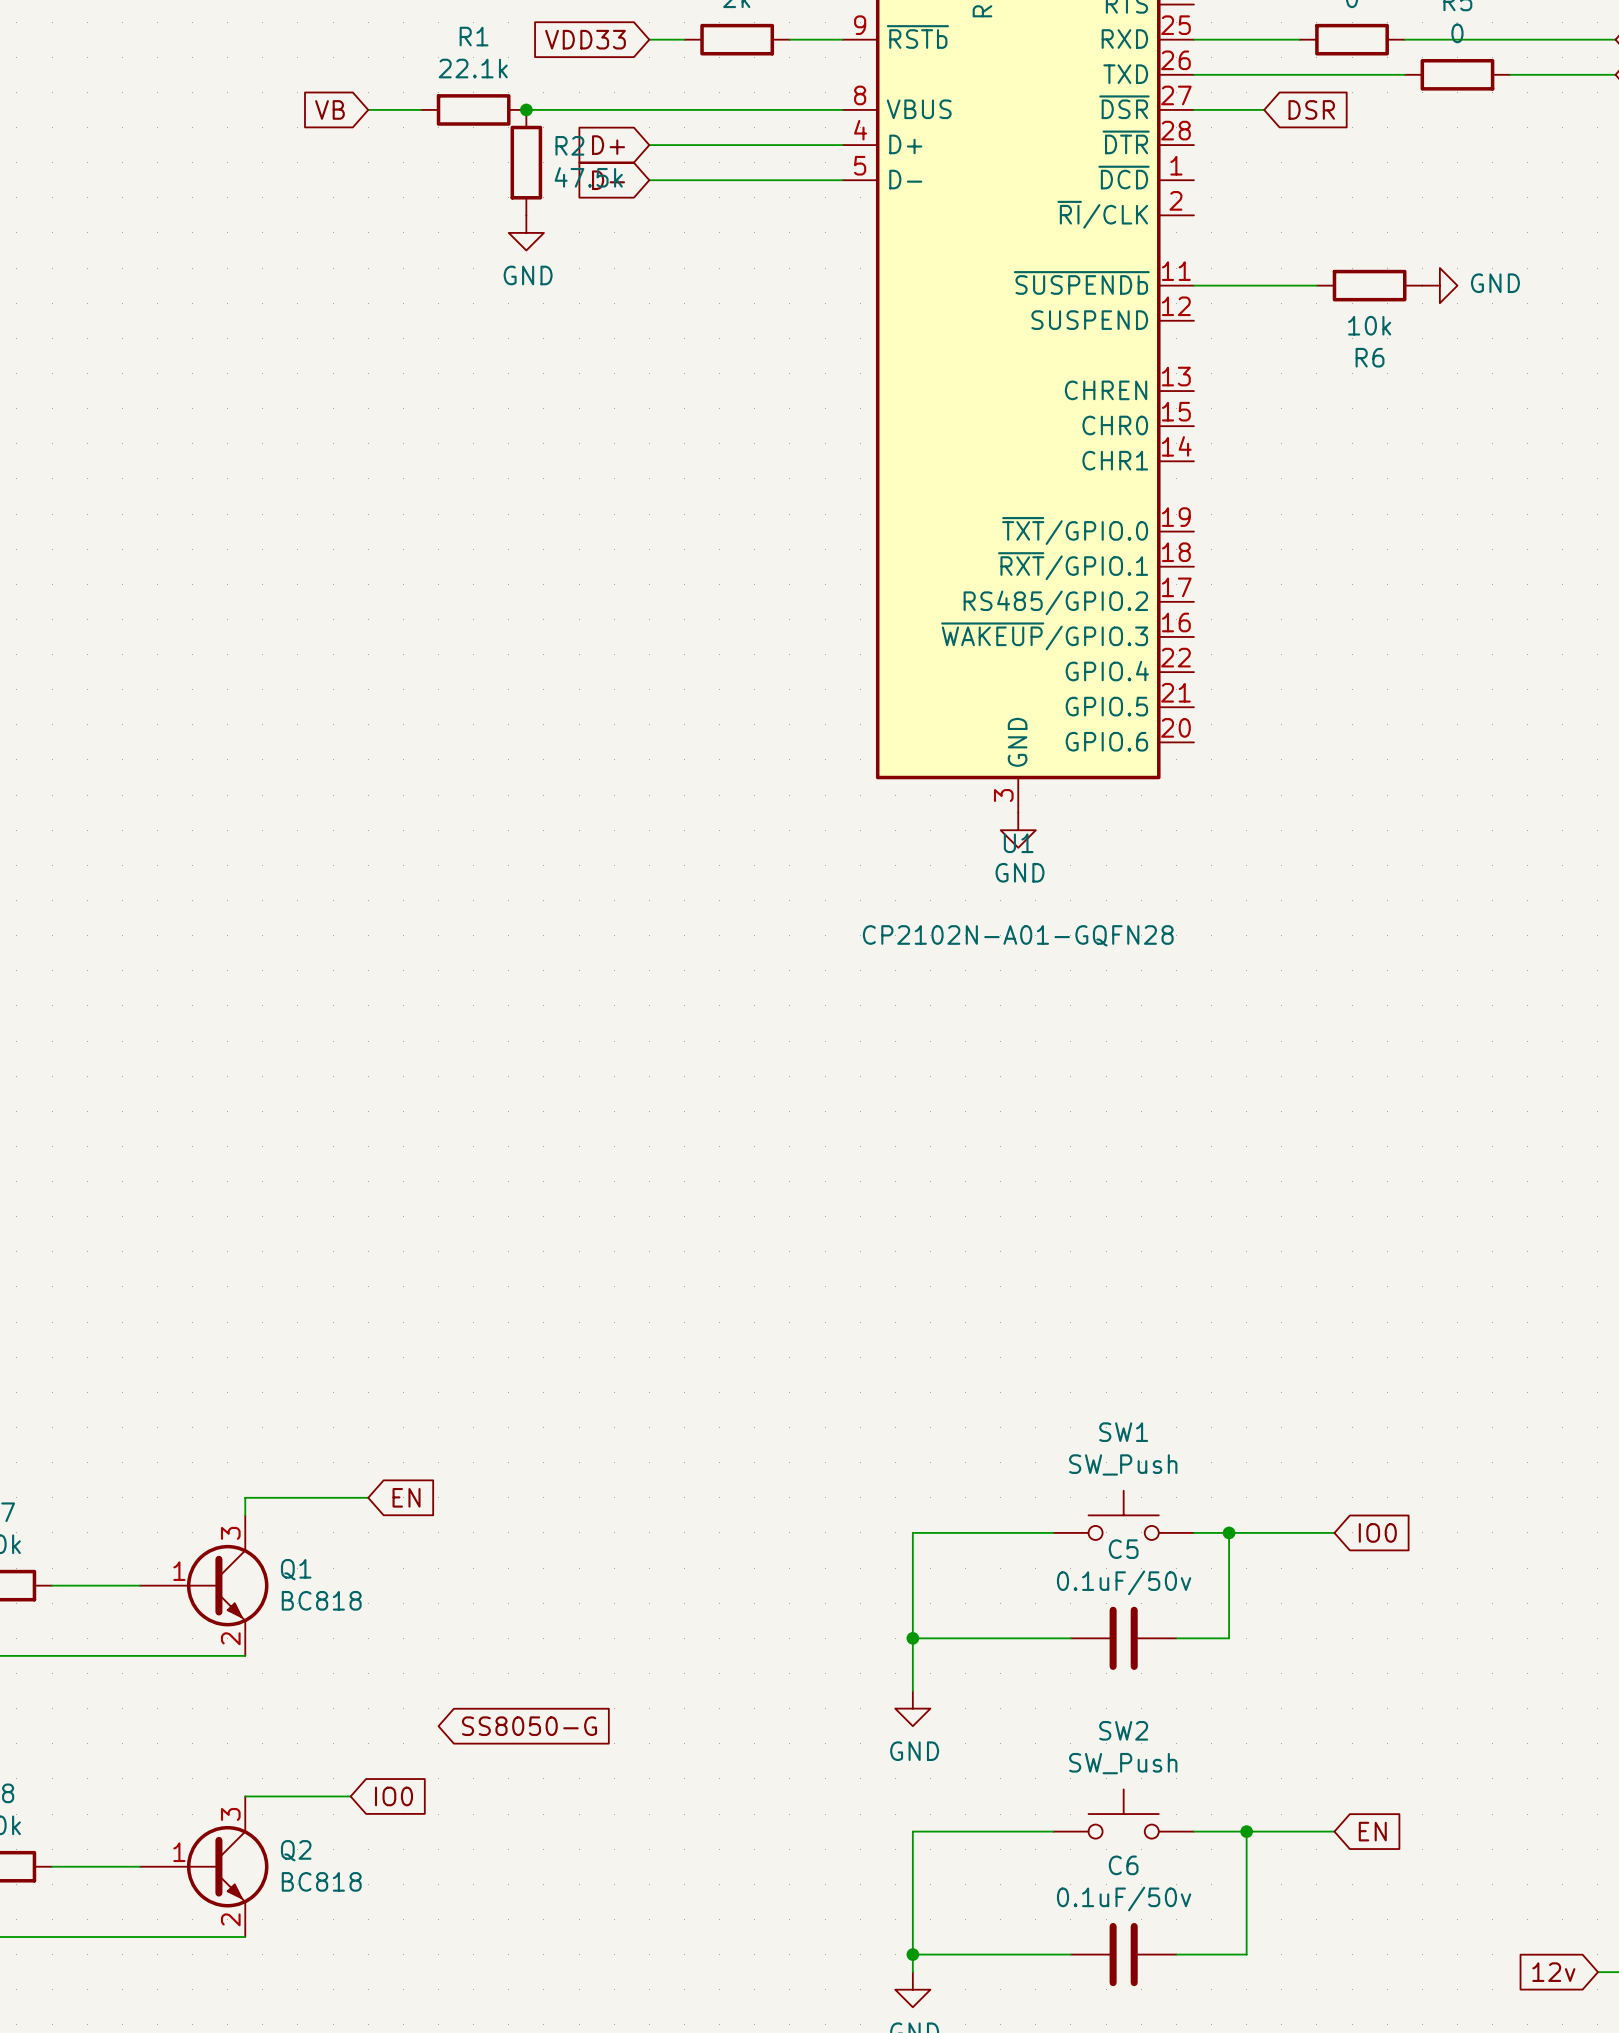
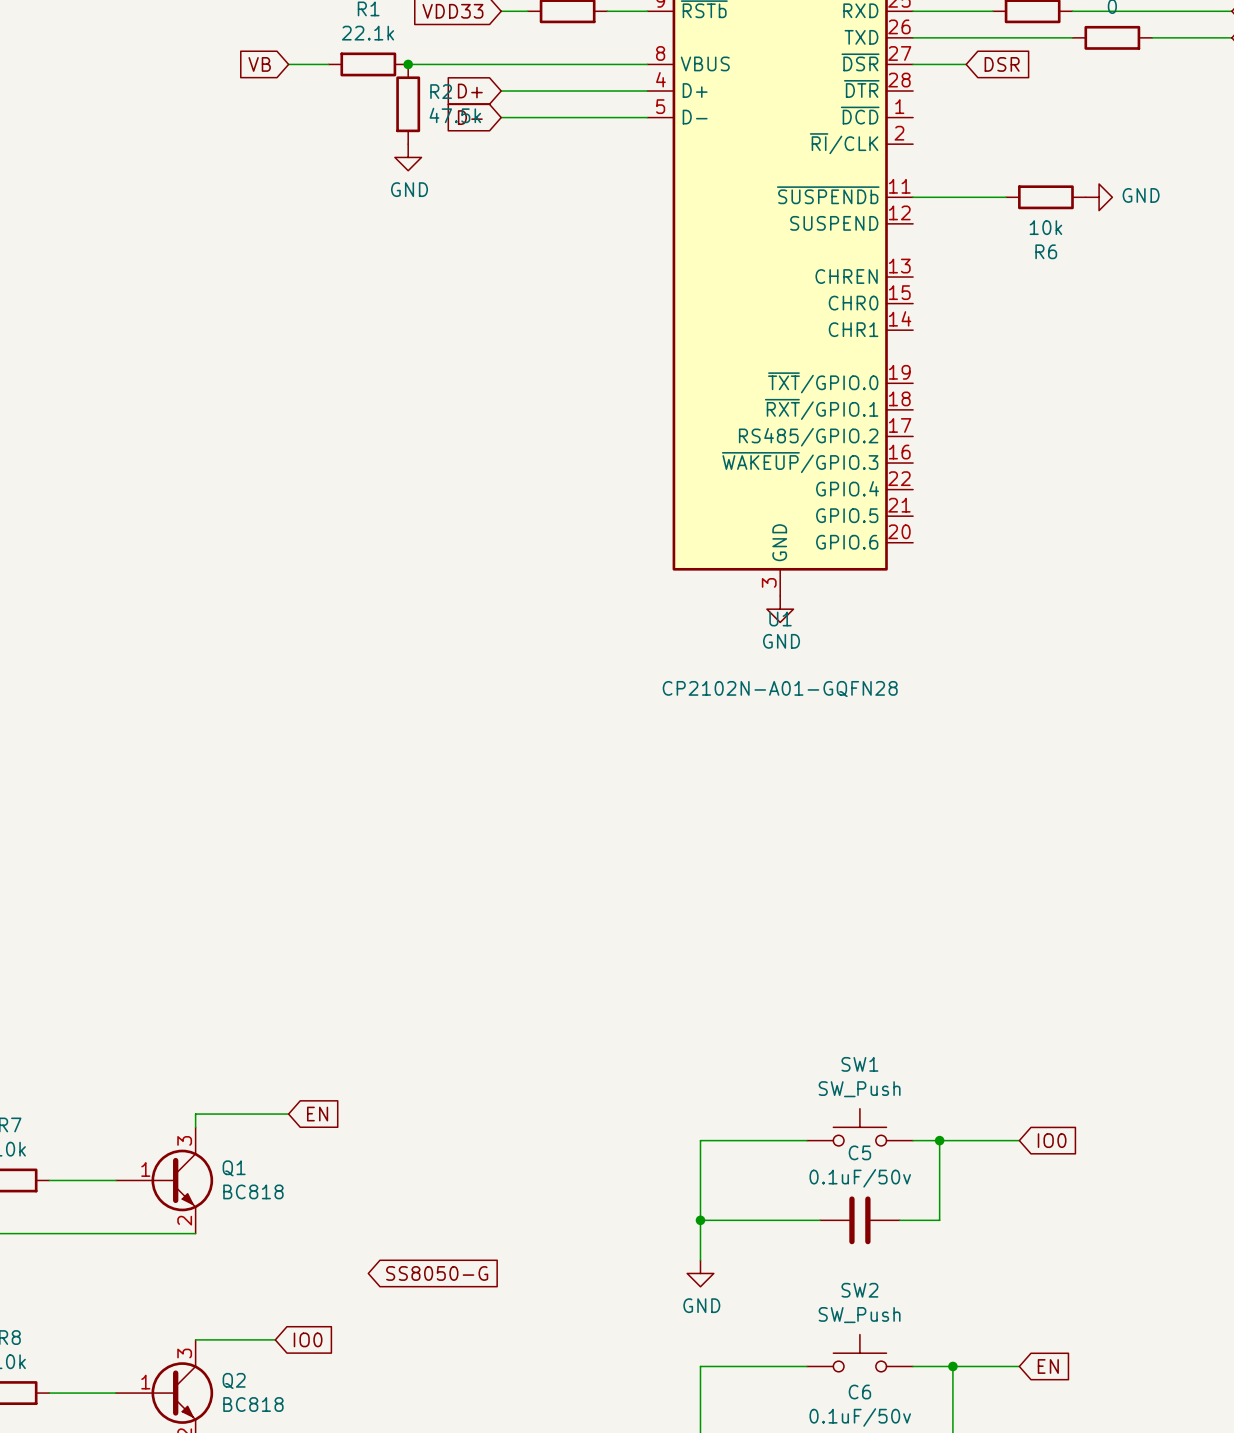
global label position: SS8050-G (529, 1726) -> SS8050-G (437, 1273)

